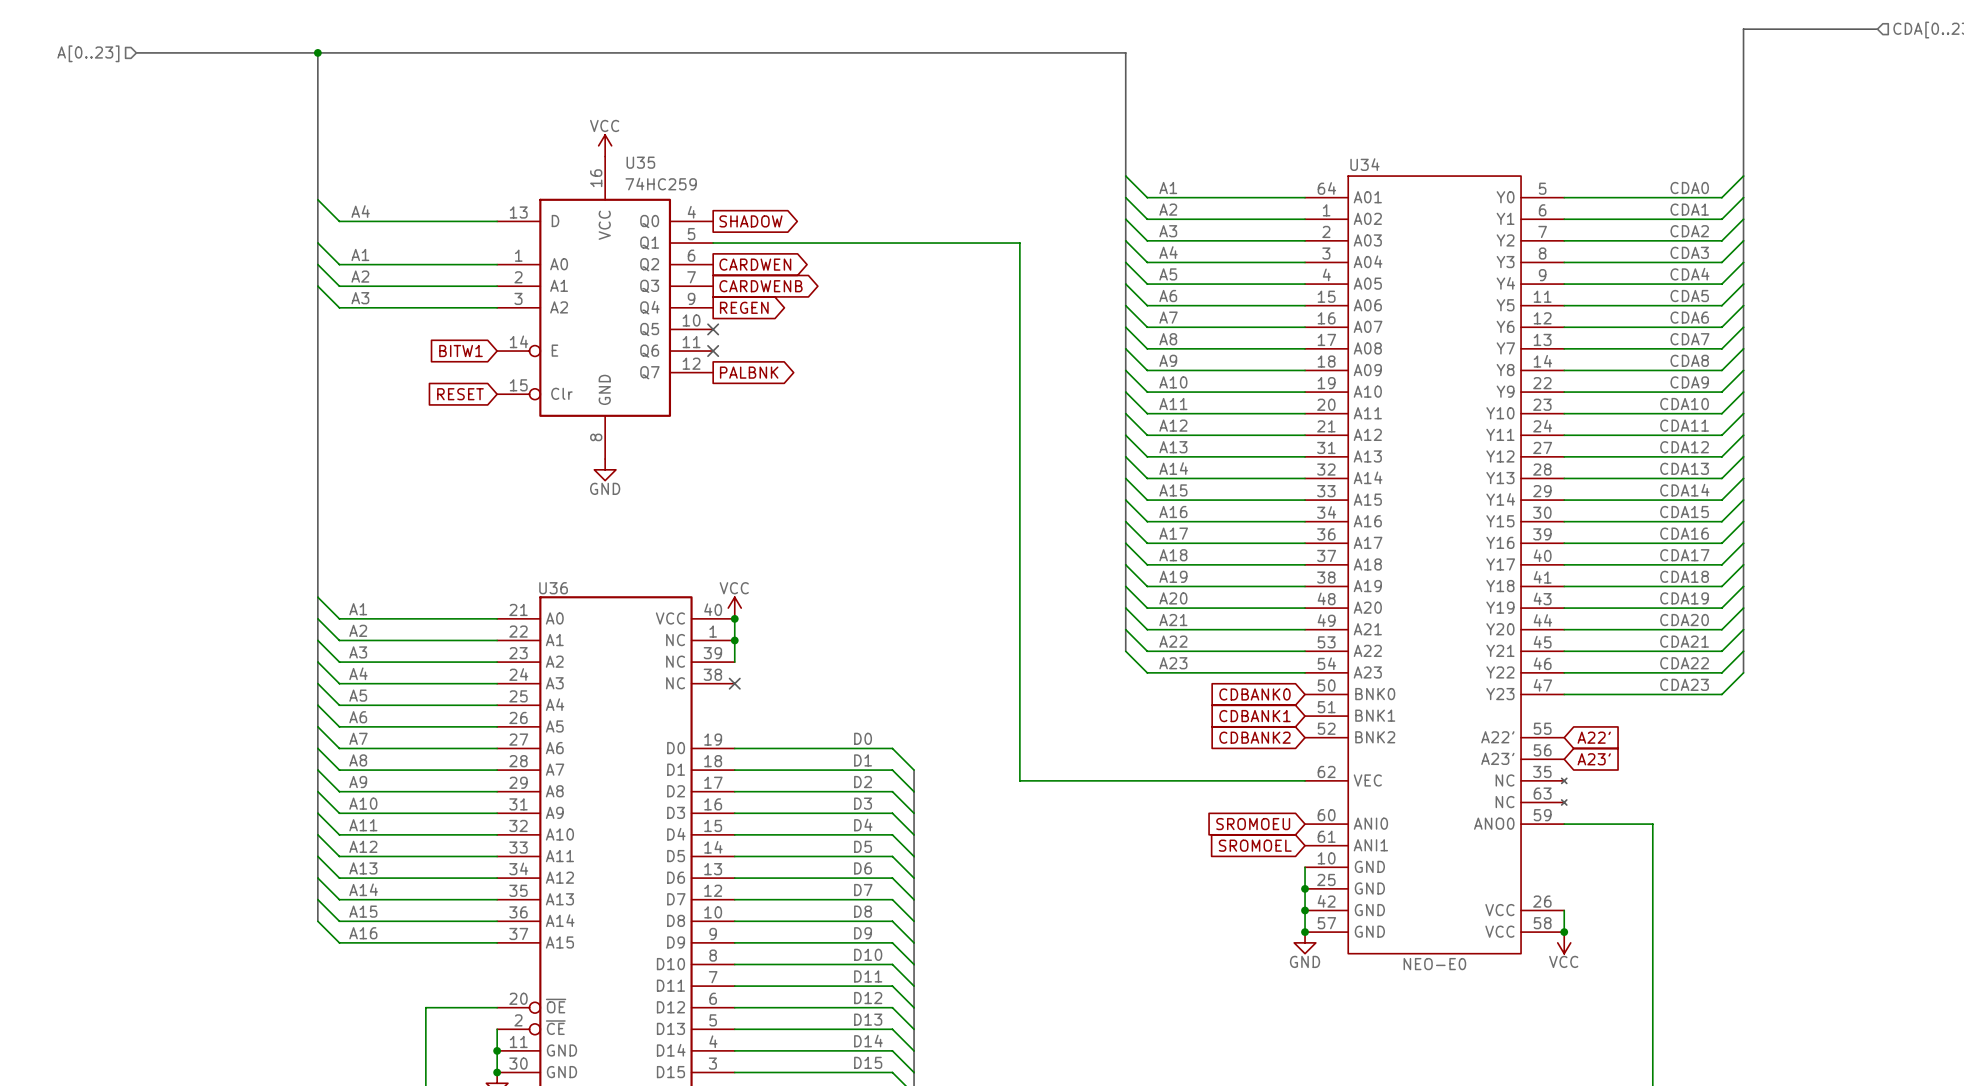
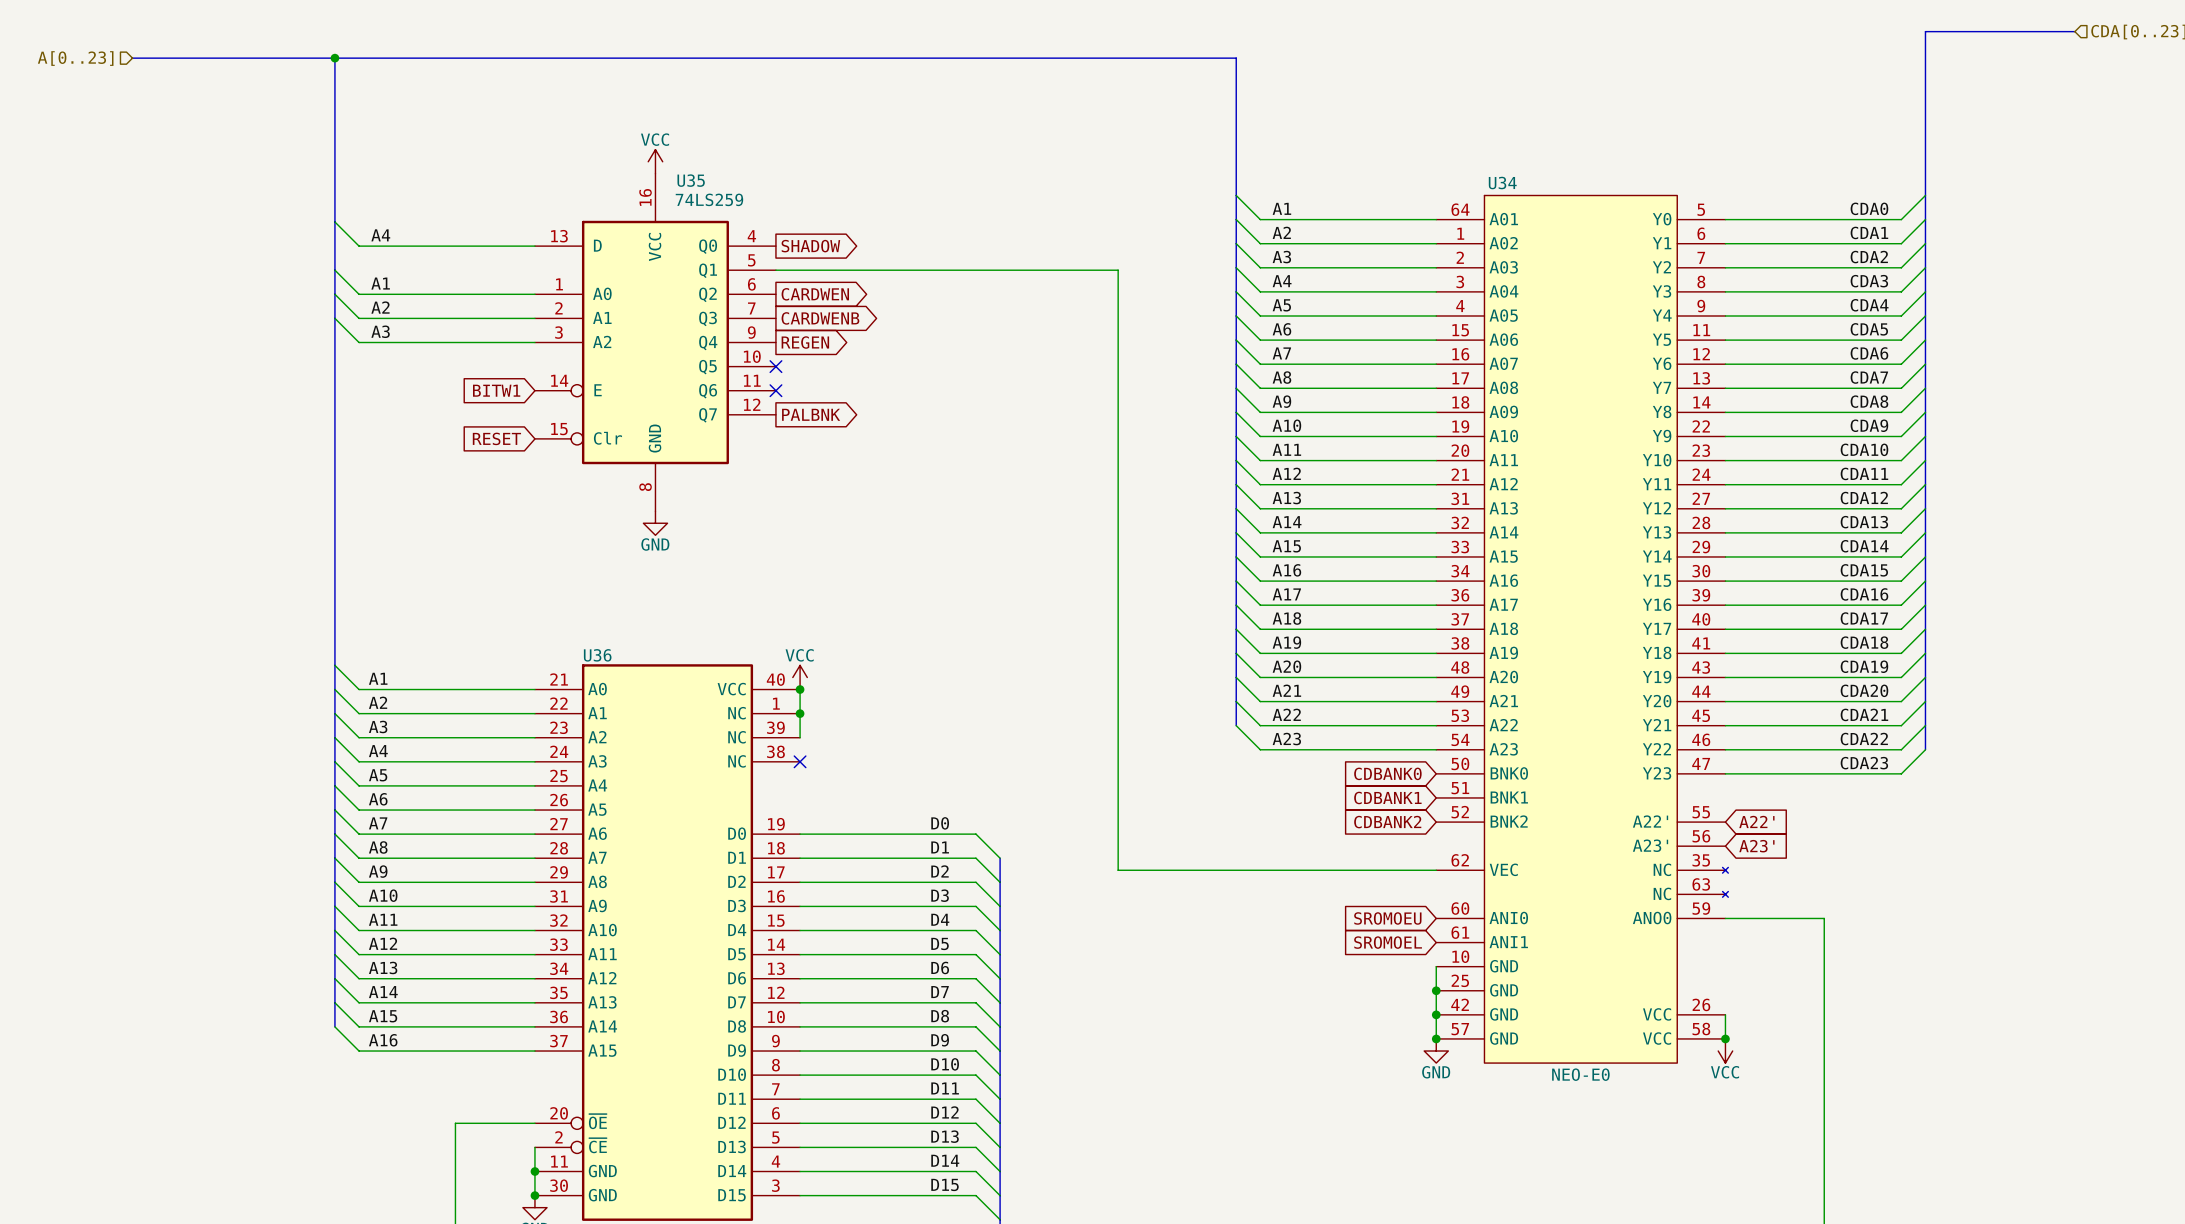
U35 value: 74HC259 (661, 184) -> 74LS259 (709, 199)

